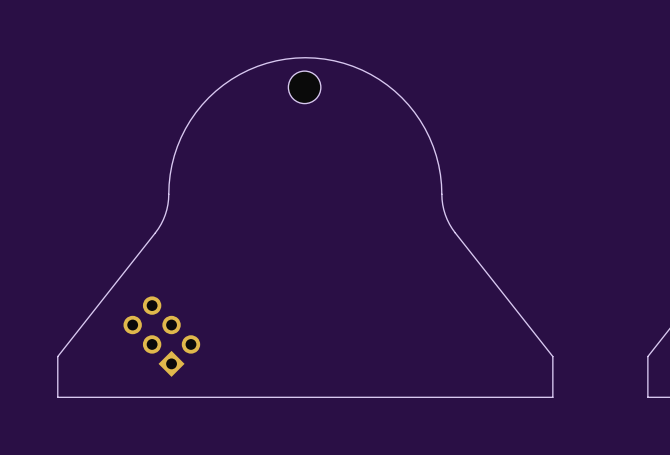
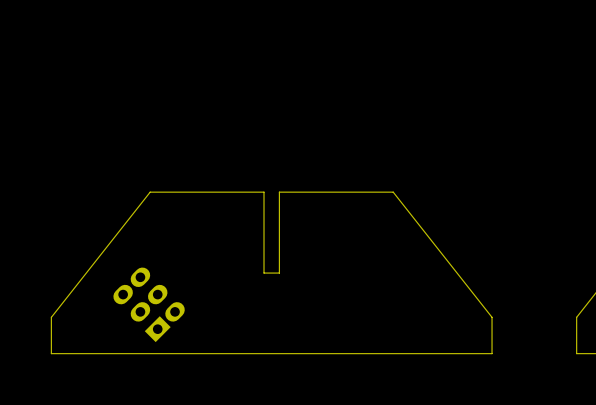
part: (304, 87) -> none
board edge: (455, 232) (443, 209) (440, 174) (433, 146) (425, 128) (408, 104) (387, 84) (362, 70) (334, 60) (305, 57) (276, 60) (248, 70) (223, 84) (202, 104) (185, 128) (177, 146) (170, 174) (166, 209) (155, 232) -> (405, 207) (393, 192) (279, 192) (279, 273) (264, 273) (264, 192) (150, 192) (138, 207)
part footprint: [123, 296, 201, 377] -> [113, 267, 185, 343]

